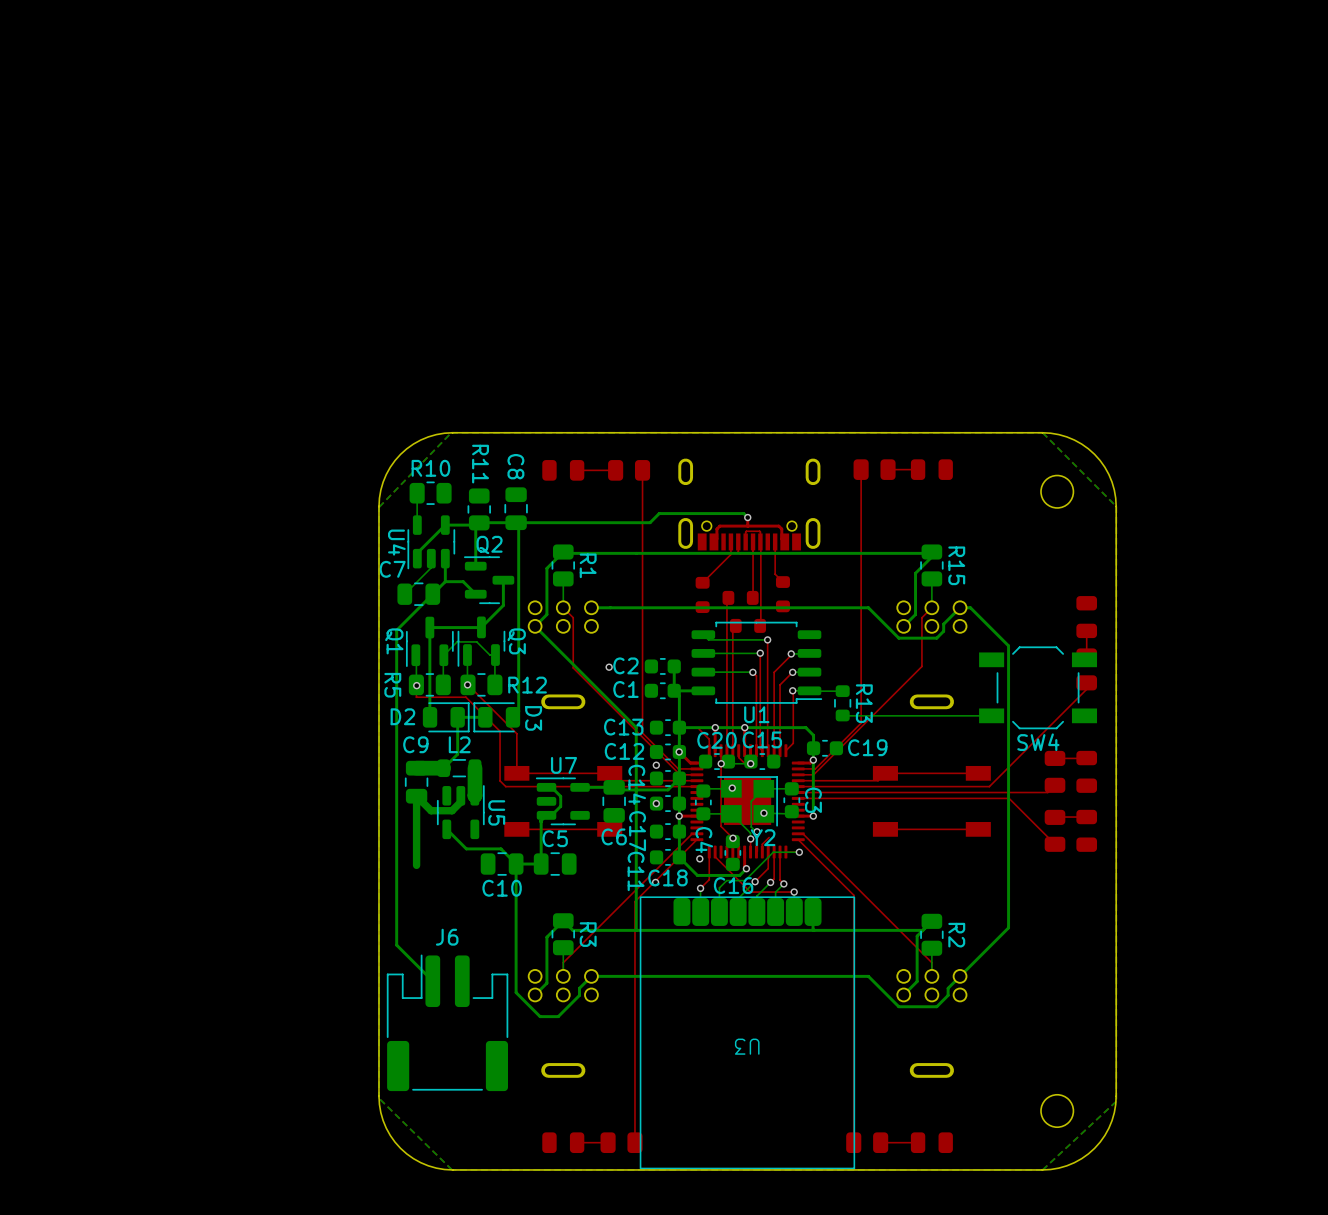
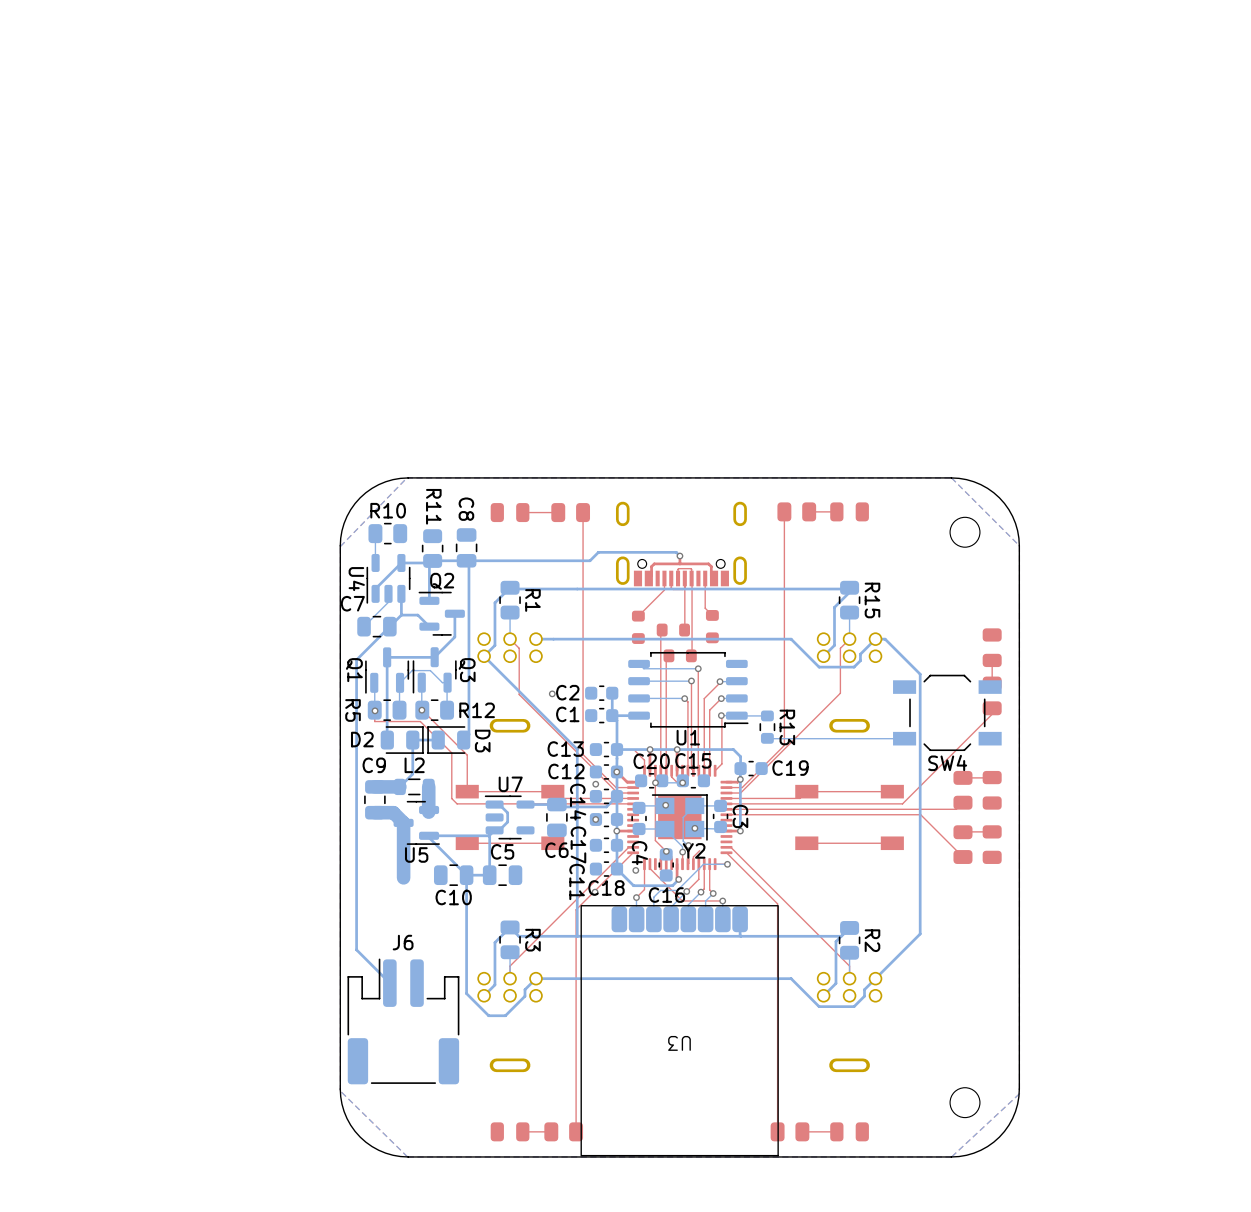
U5 footprint: [436, 785, 485, 840] -> [393, 800, 440, 845]
bottom track: (460, 795) (460, 801) (452, 810) (431, 810) (416, 796) (416, 865) -> none
bottom track: none -> (374, 812) (393, 812) (403, 822) (403, 877)
U5 name position: U5 (496, 812) -> U5 (416, 854)
bottom track: (446, 829) (466, 848) (500, 848) -> (489, 835) (429, 835) (452, 861)

